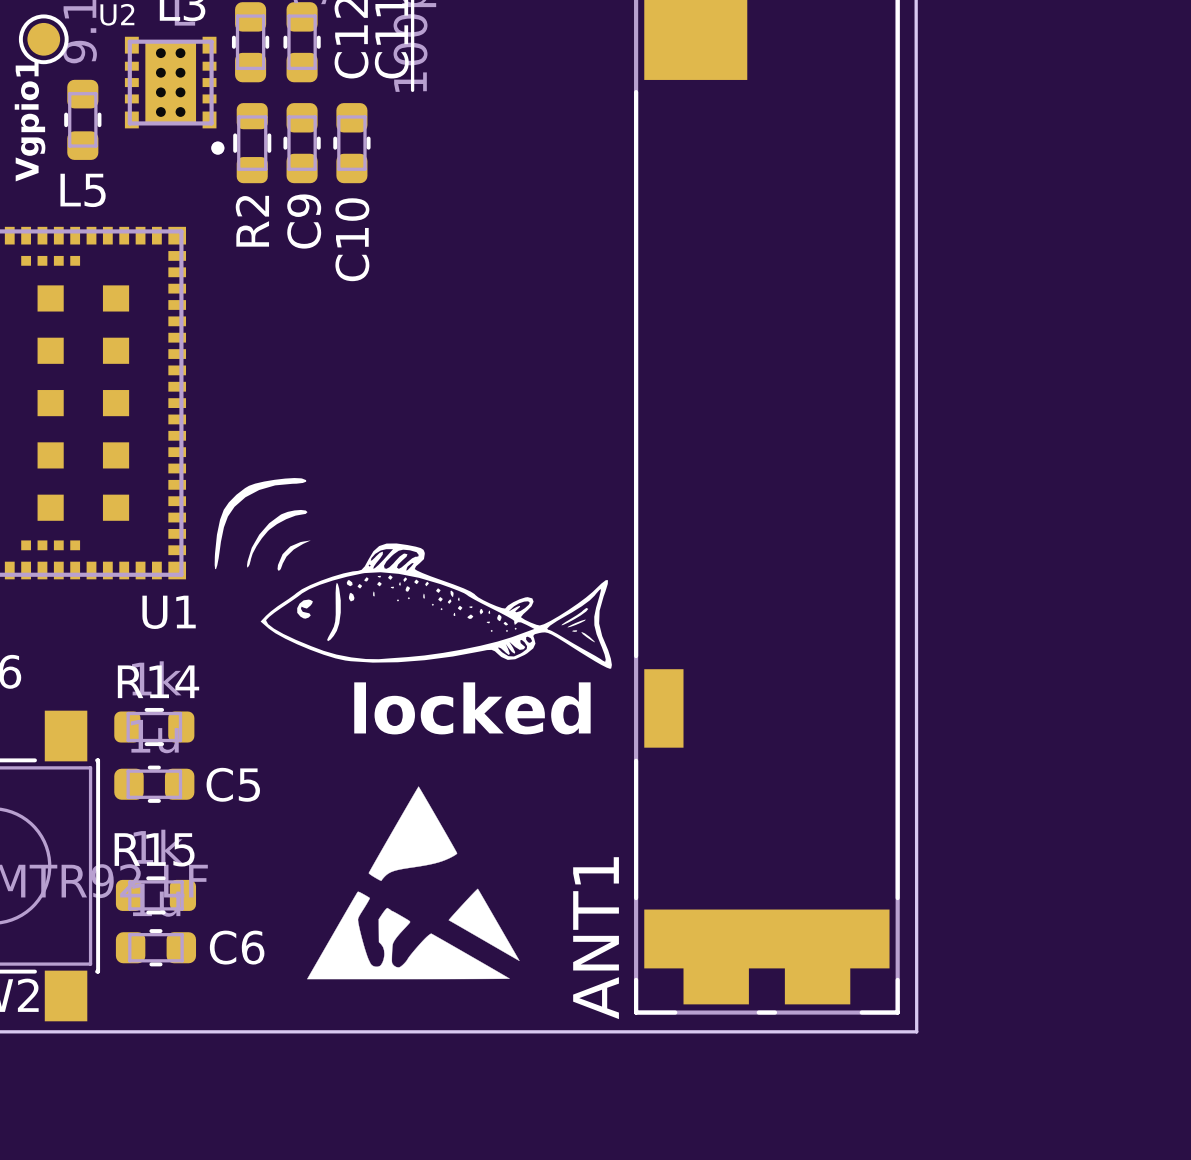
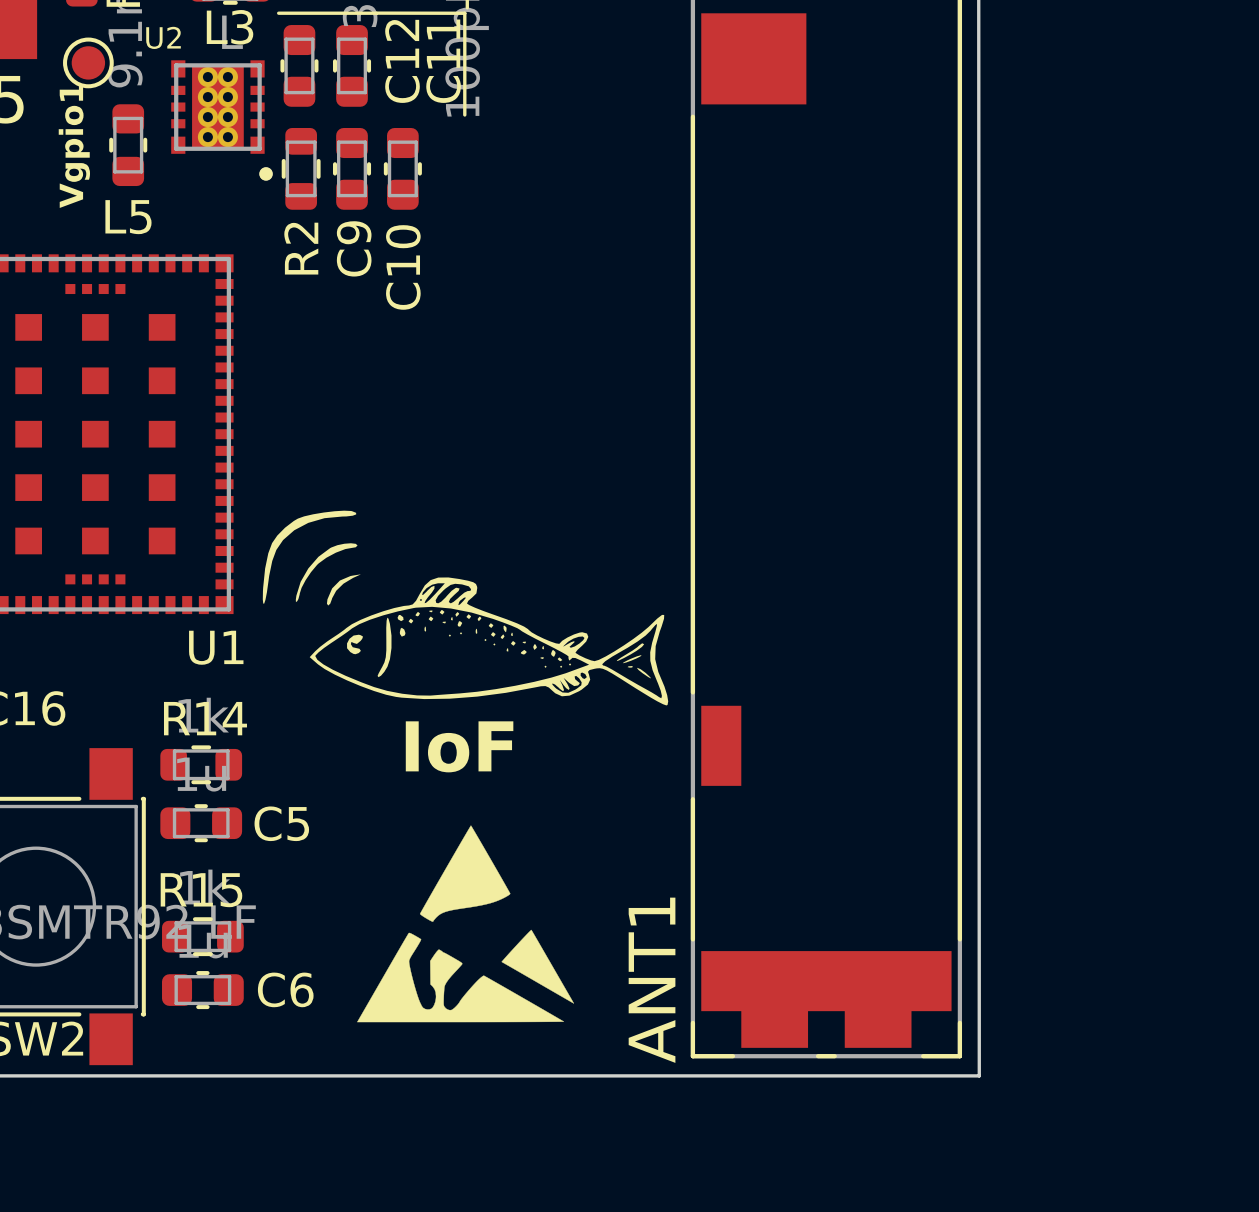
text: locked (472, 708) -> IoF (459, 746)

